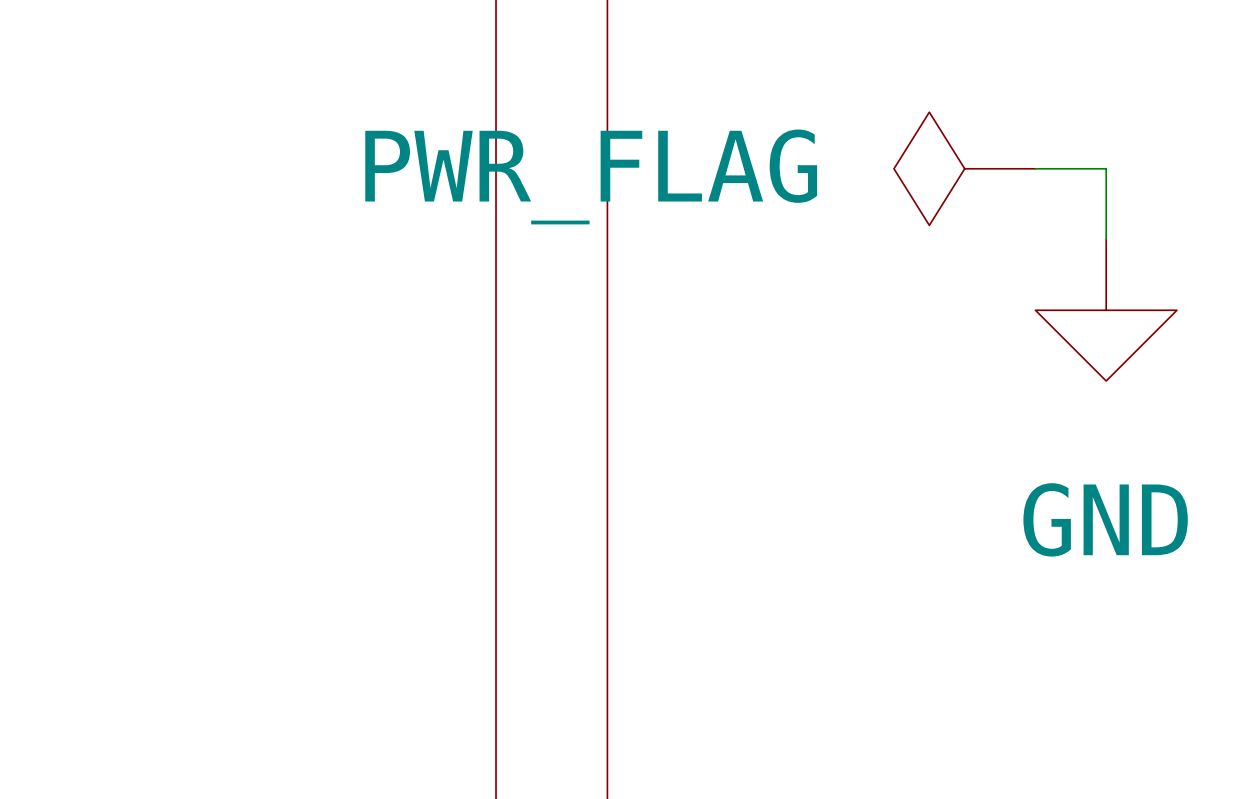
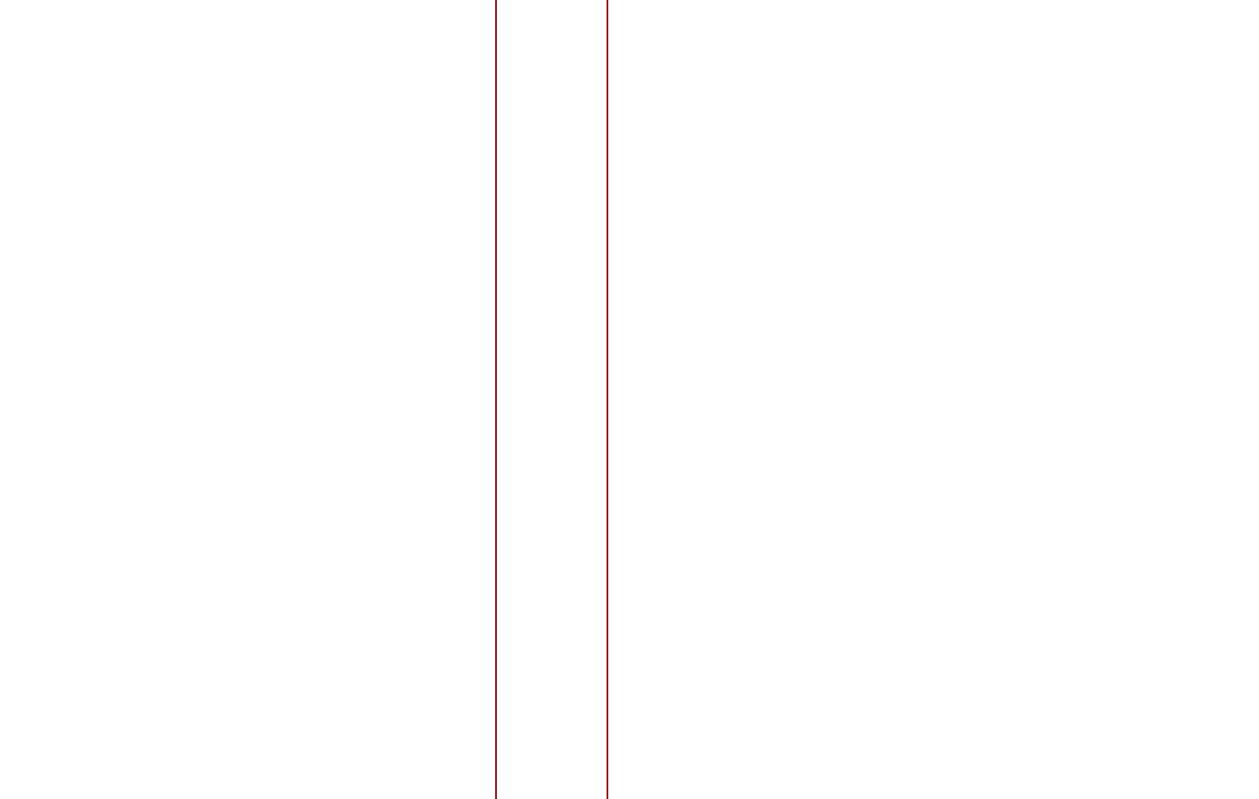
power symbol: PWR_FLAG (964, 168) -> none
wire: (1035, 168) (1106, 168) (1106, 239) -> none
power symbol: GND (1106, 310) -> none

